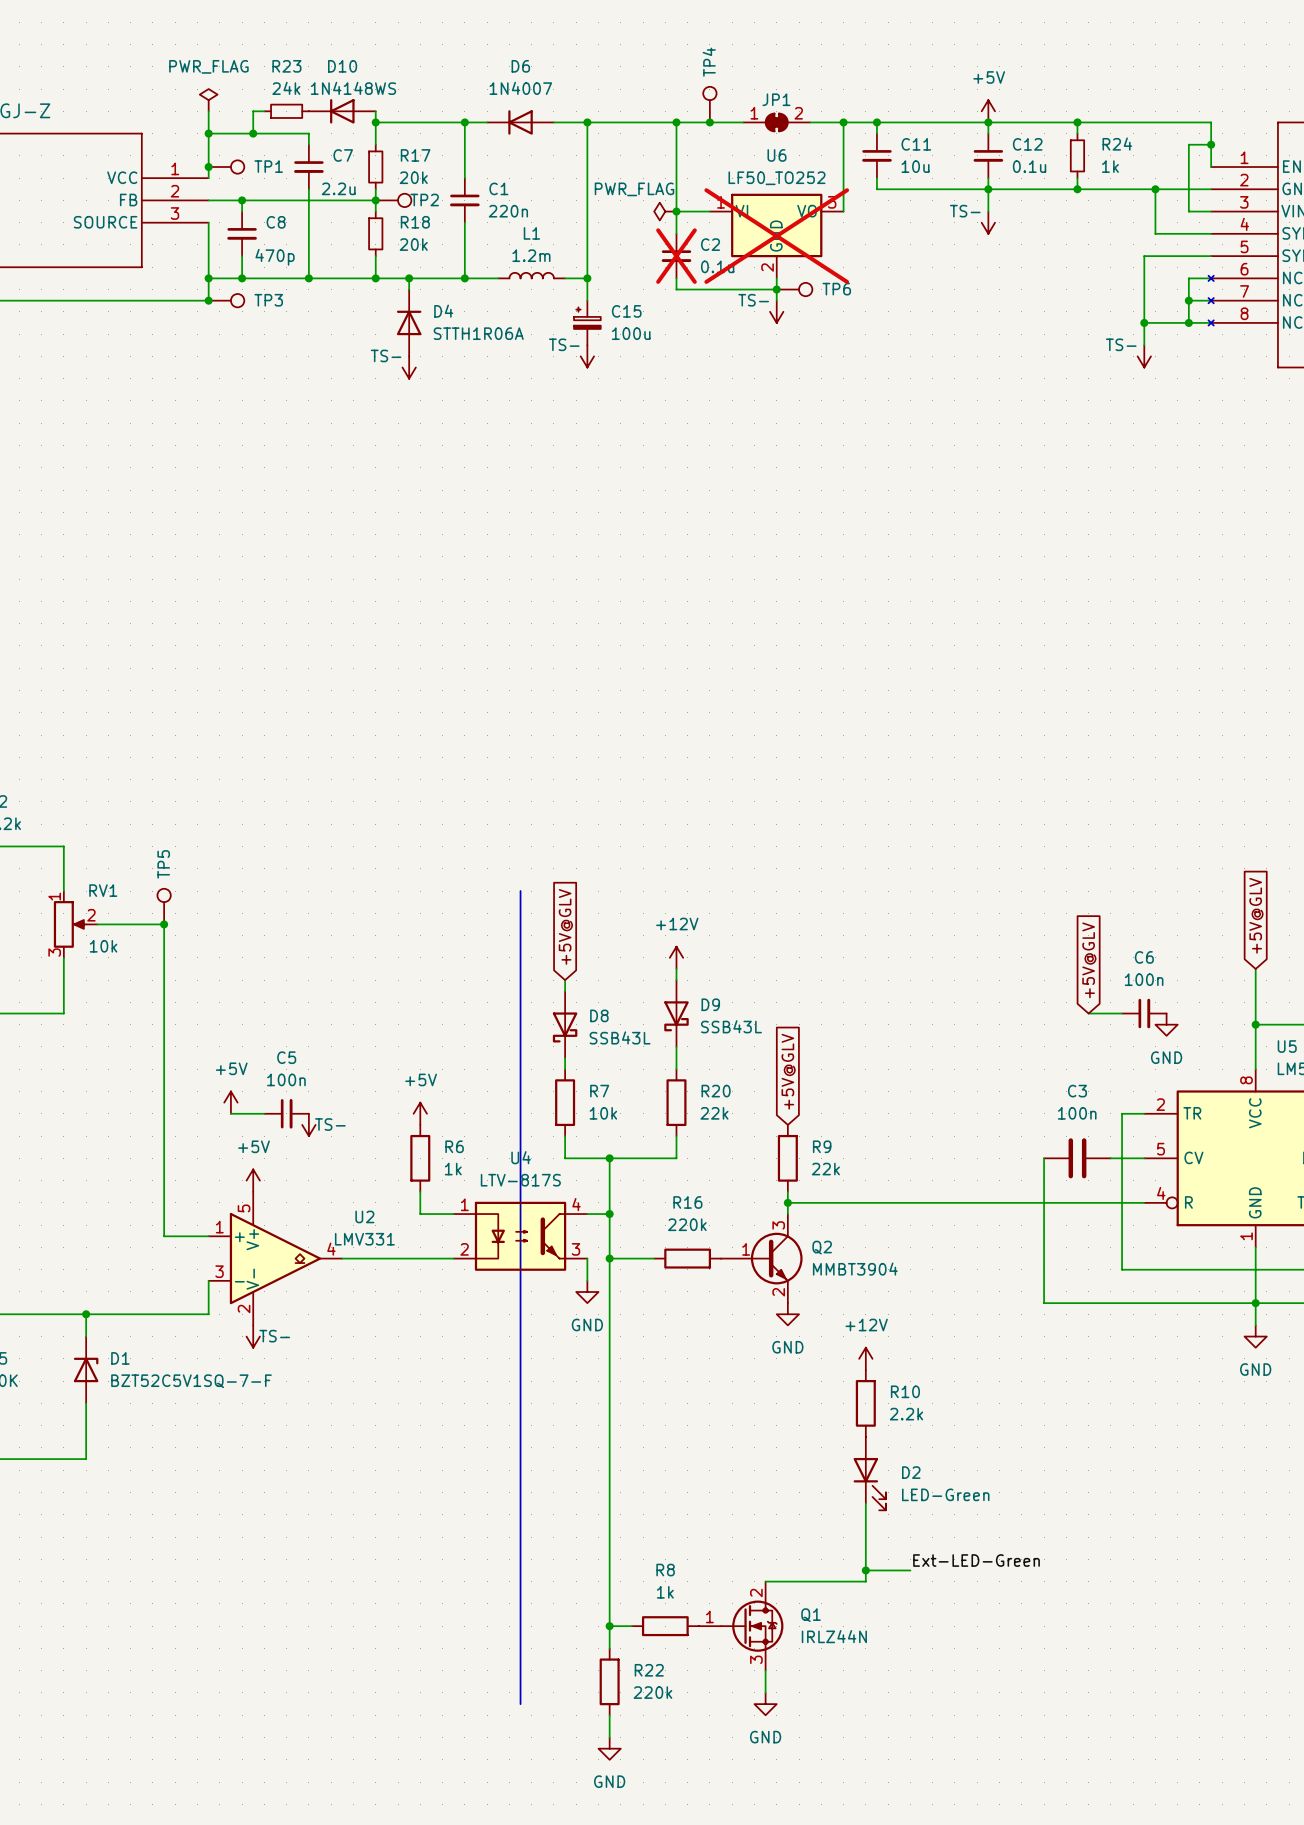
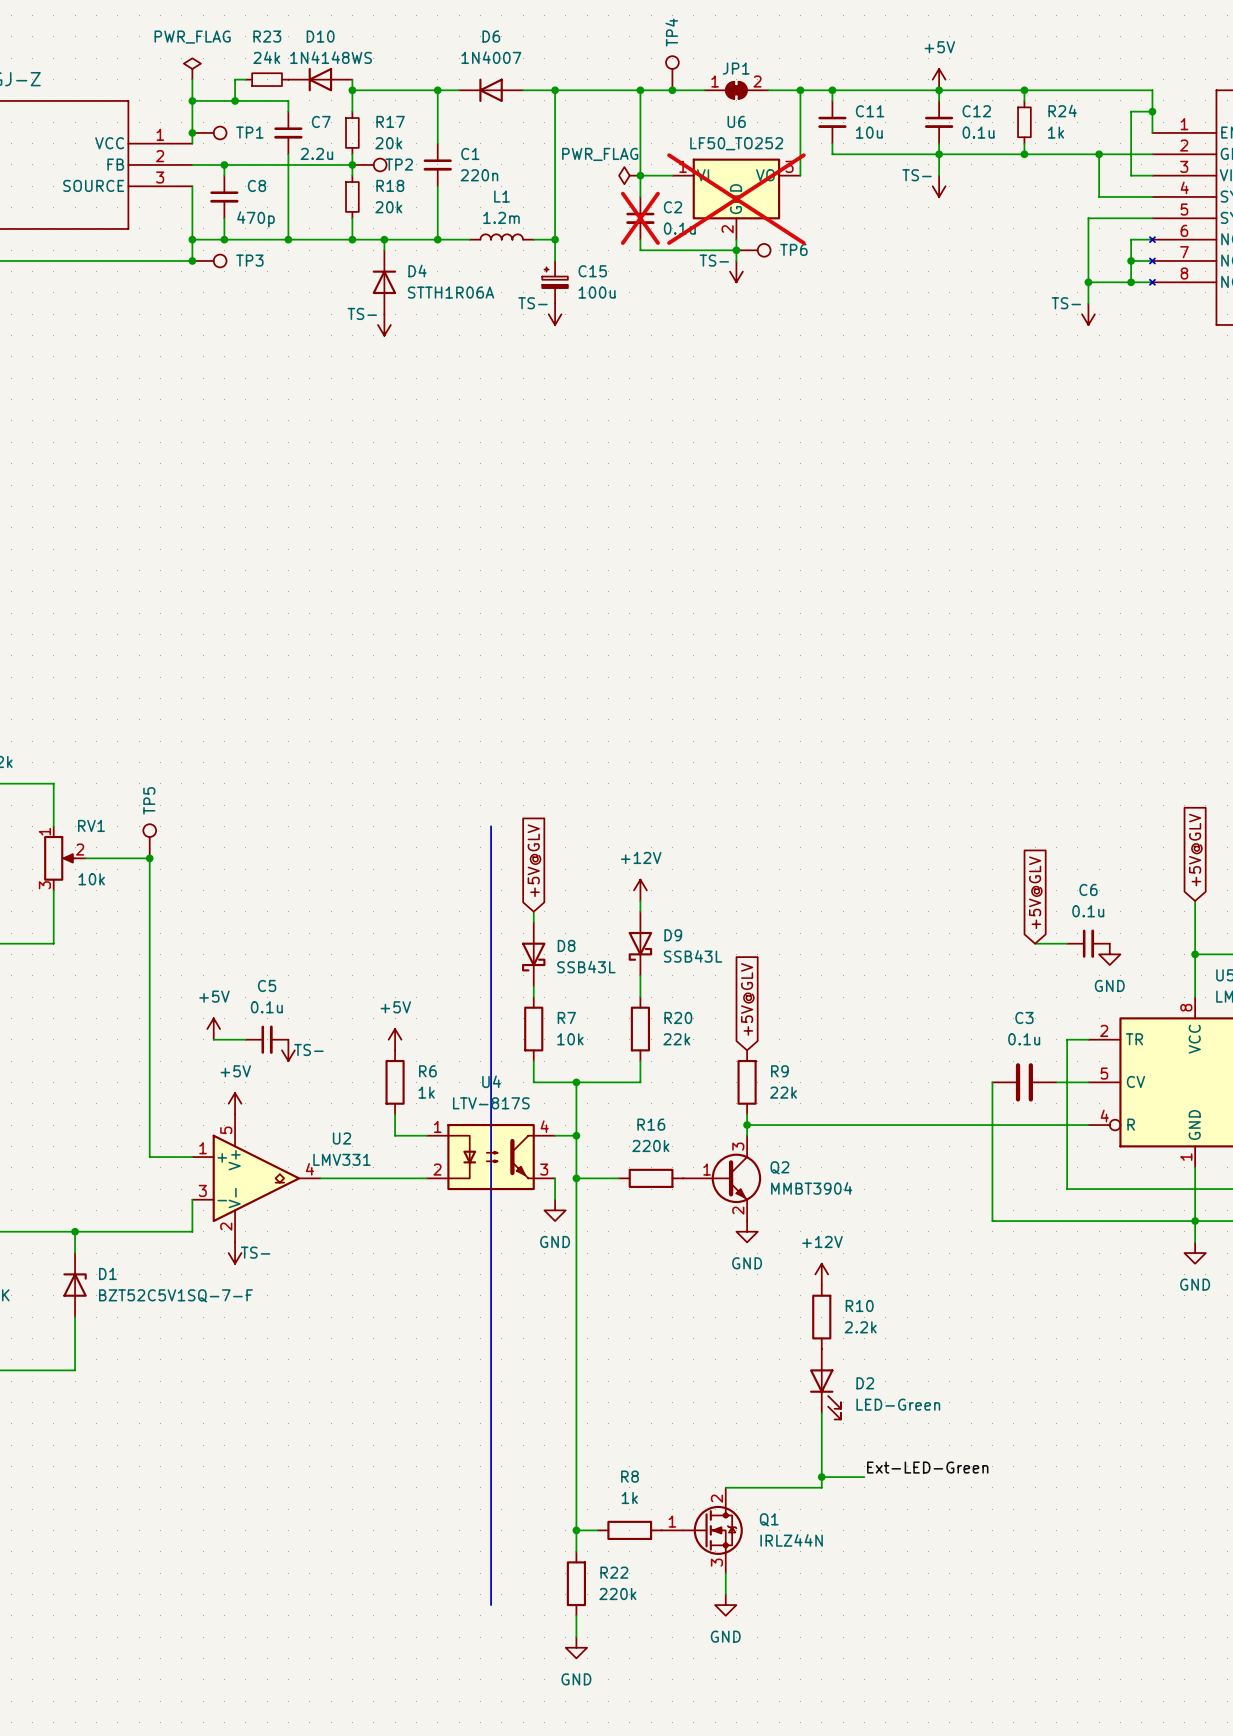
C6 value: 100n (1144, 979) -> 0.1u (1088, 911)
C5 value: 100n (286, 1079) -> 0.1u (266, 1007)
C3 value: 100n (1077, 1113) -> 0.1u (1024, 1039)

